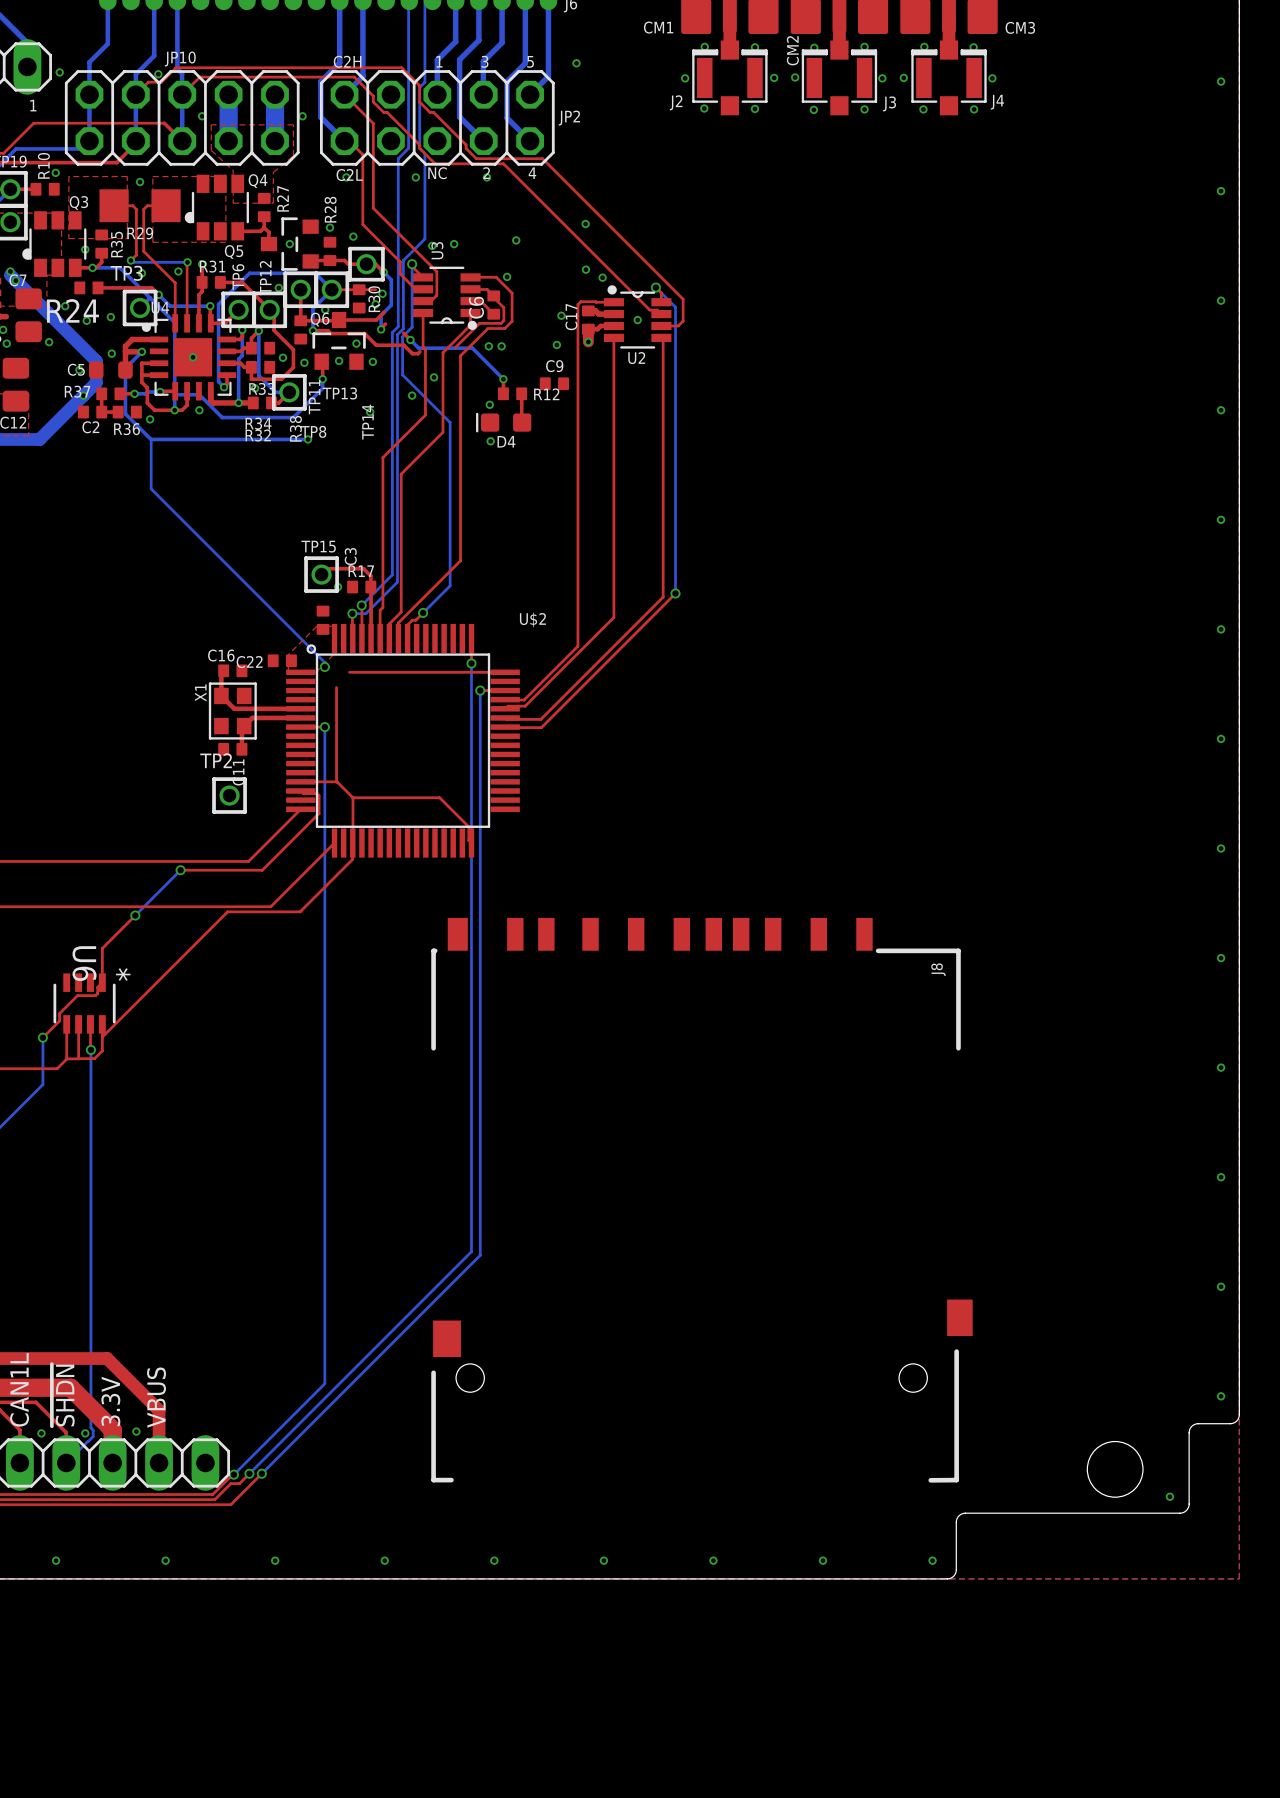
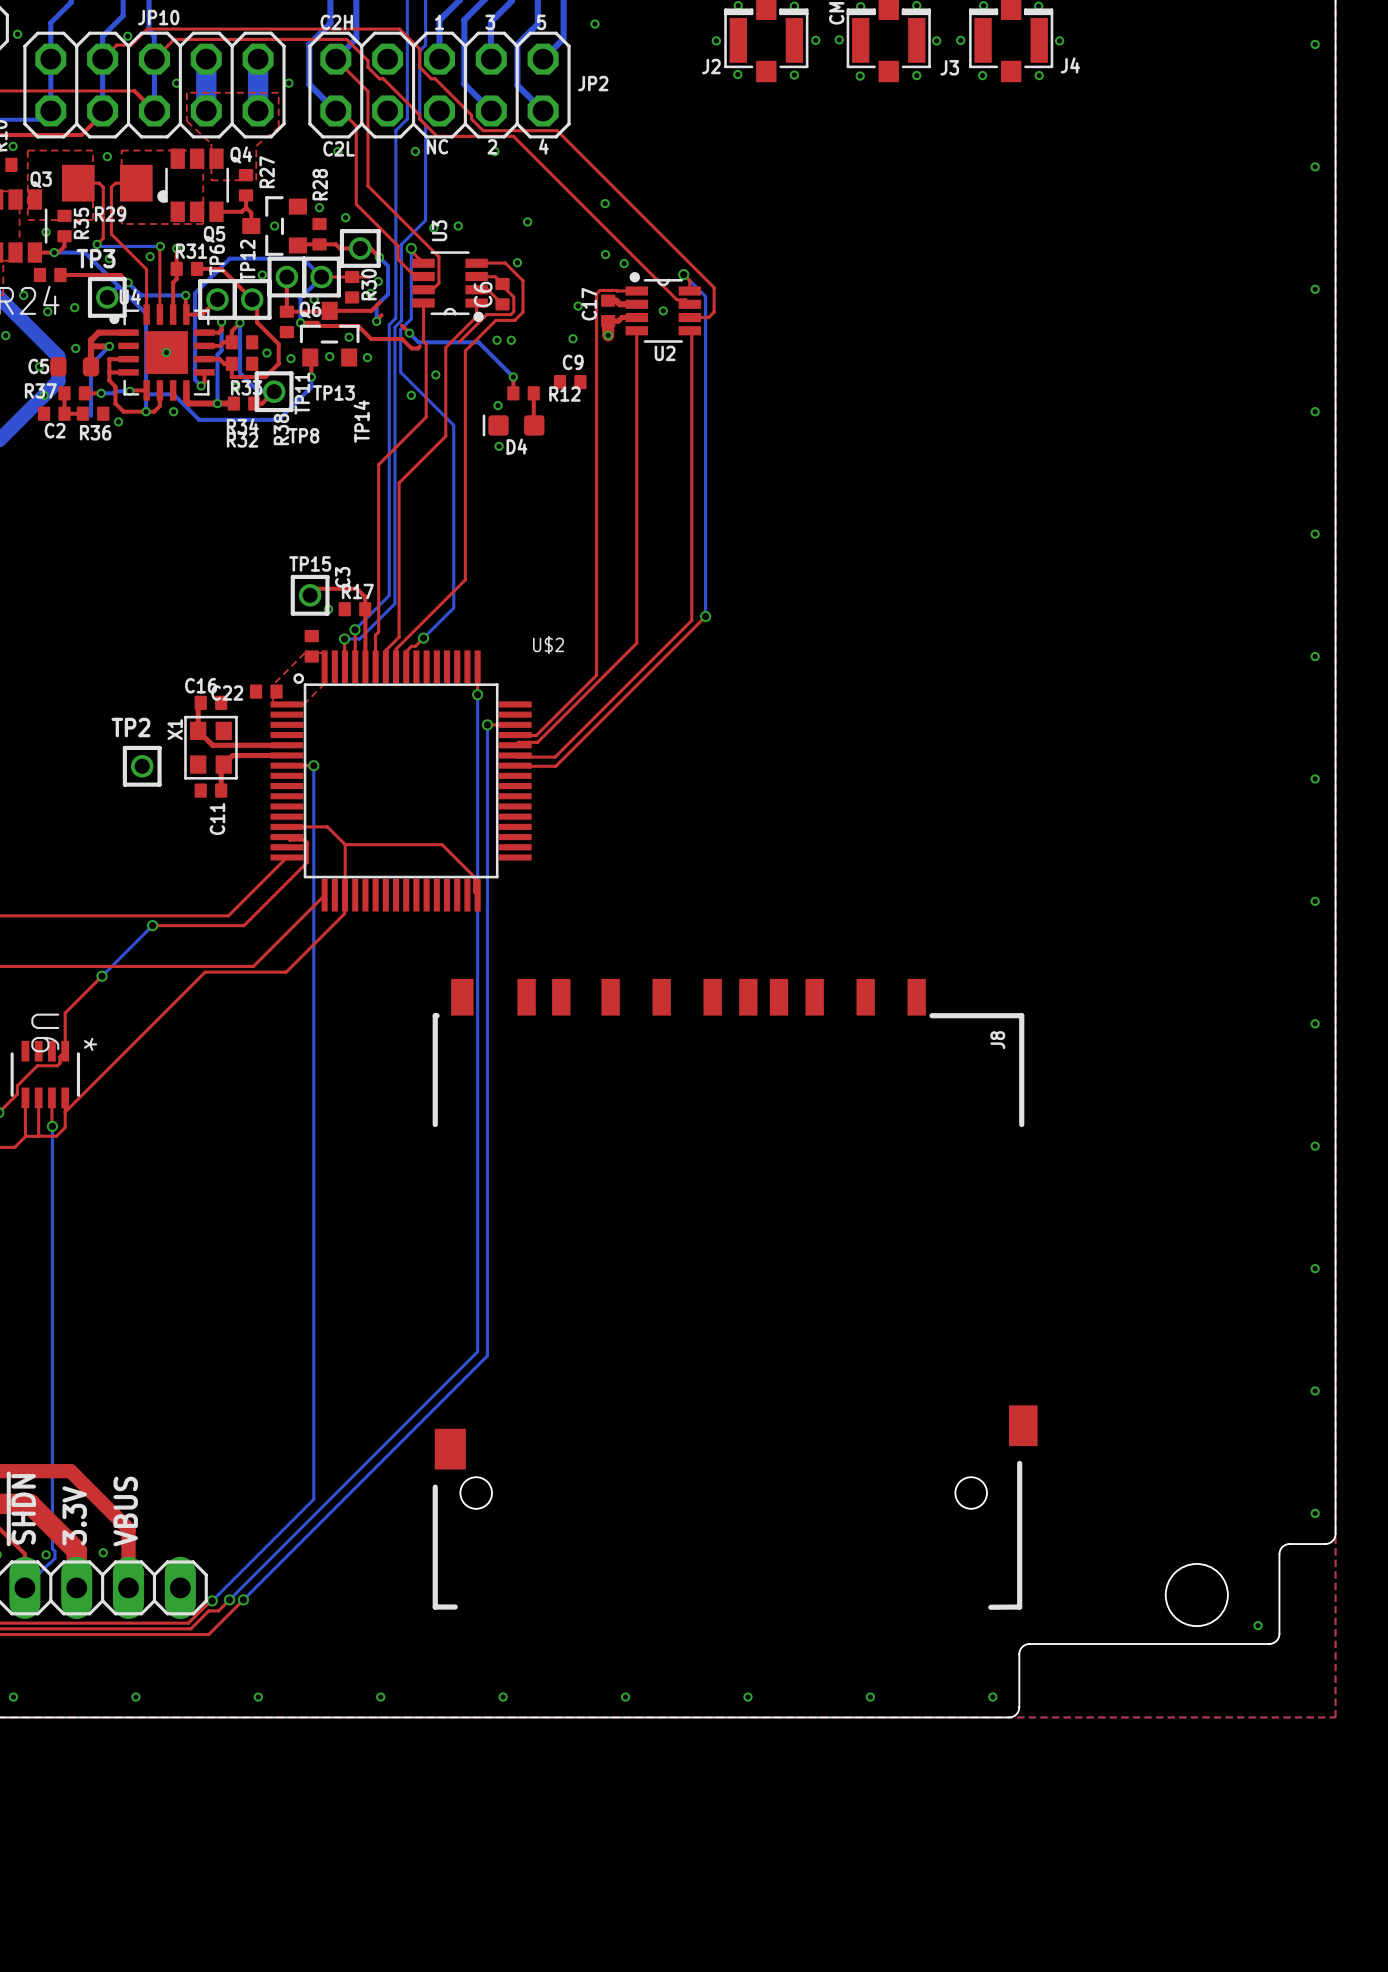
via: (370, 412) -> none
bottom track: (125, 413) (151, 439) -> none
bottom track: (308, 439) (151, 439) (151, 488) (324, 662) (324, 667) -> none
via: (308, 439) -> none
via: (324, 667) -> none
top track: (349, 672) (505, 672) -> none
top track: (336, 687) (336, 781) -> none
TP2 position: (229, 795) -> (142, 766)

